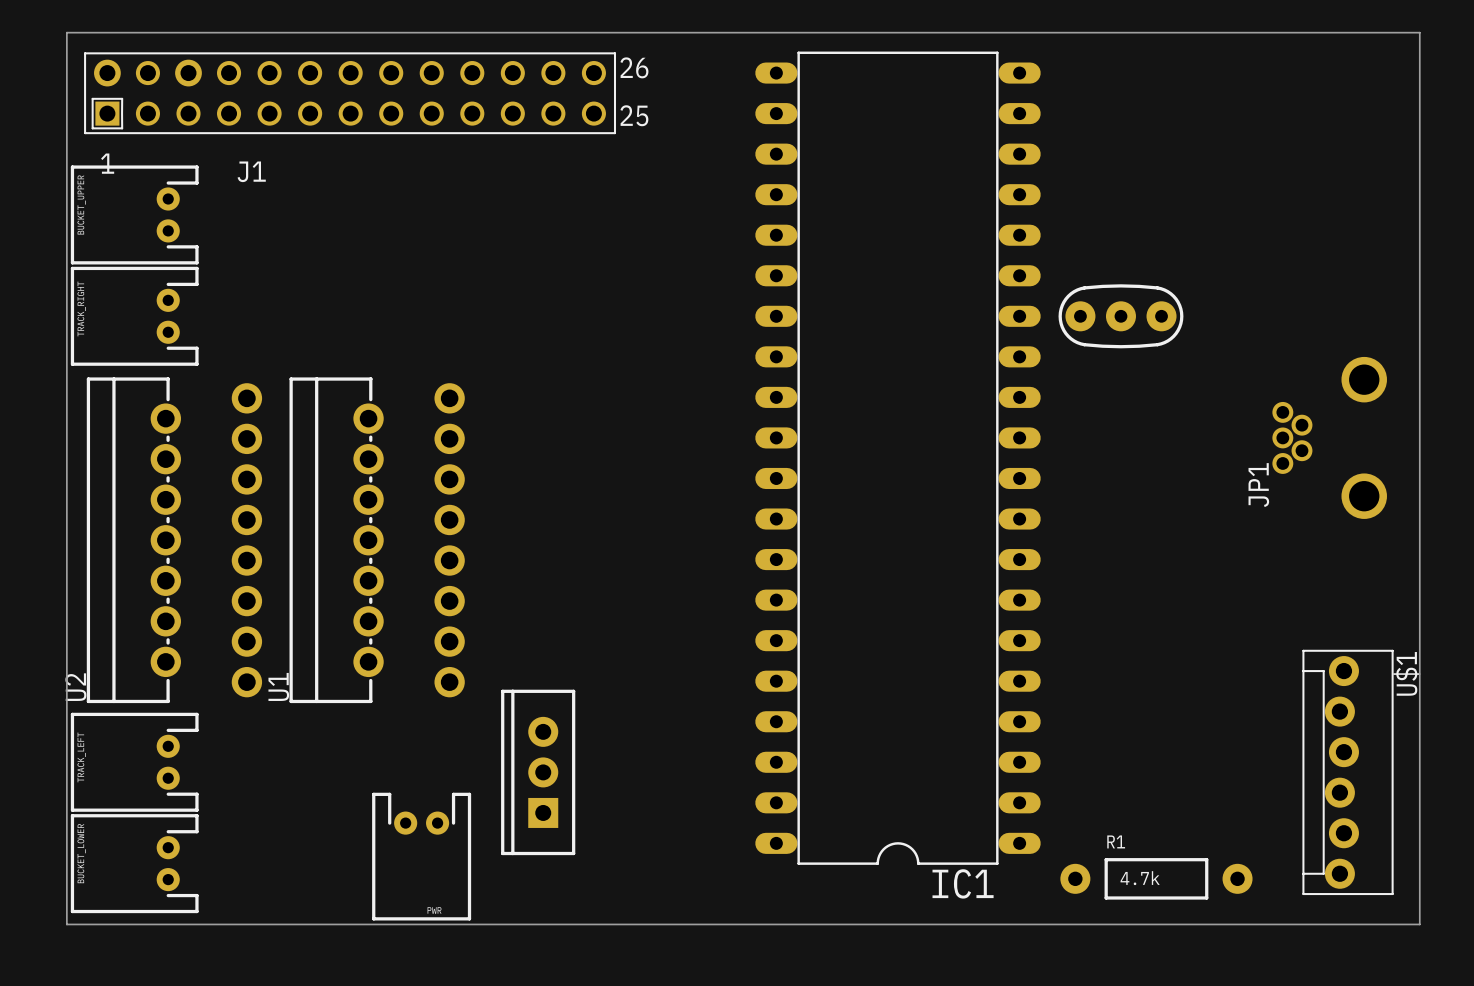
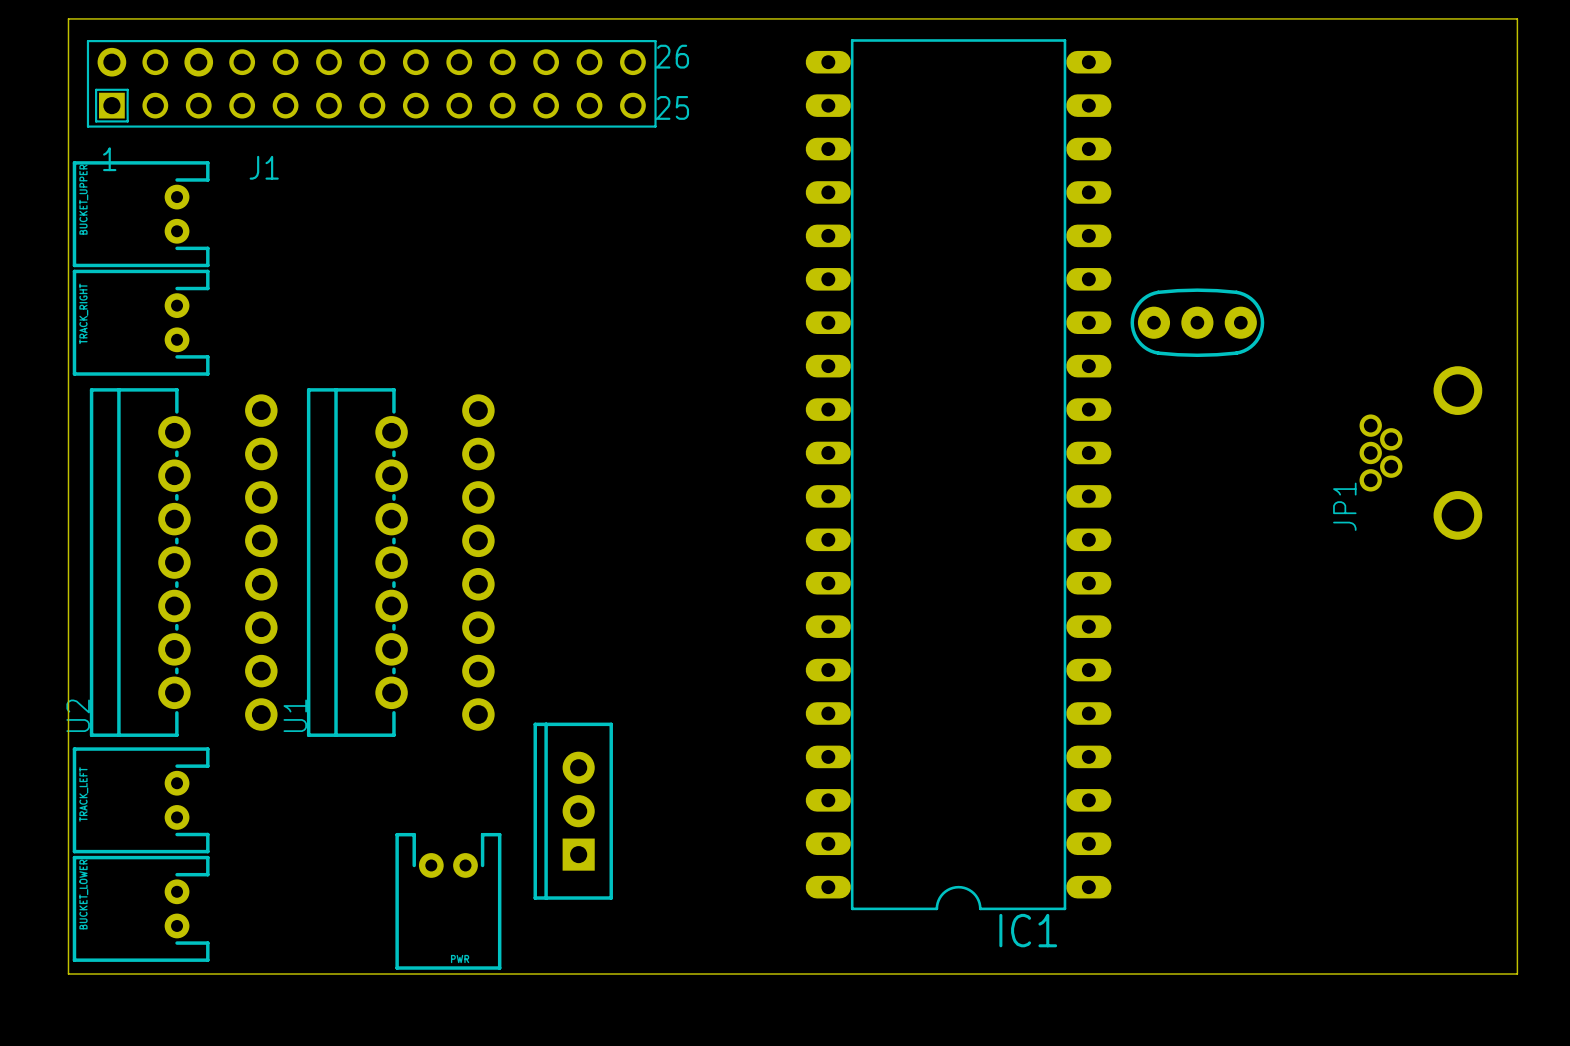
U$1: (1348, 772) -> none
R1: 4.7k (1156, 878) -> none

